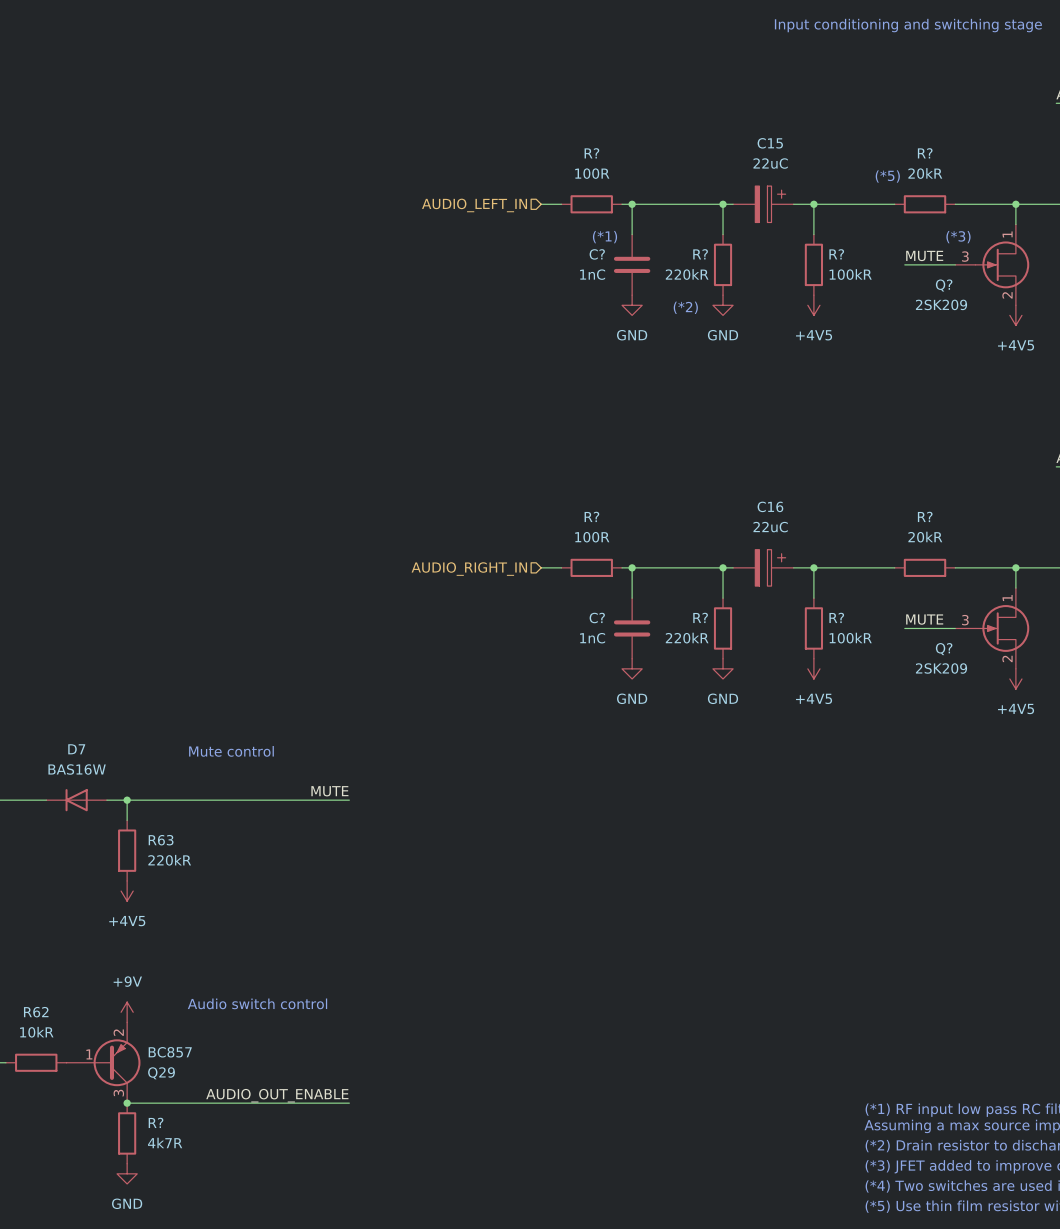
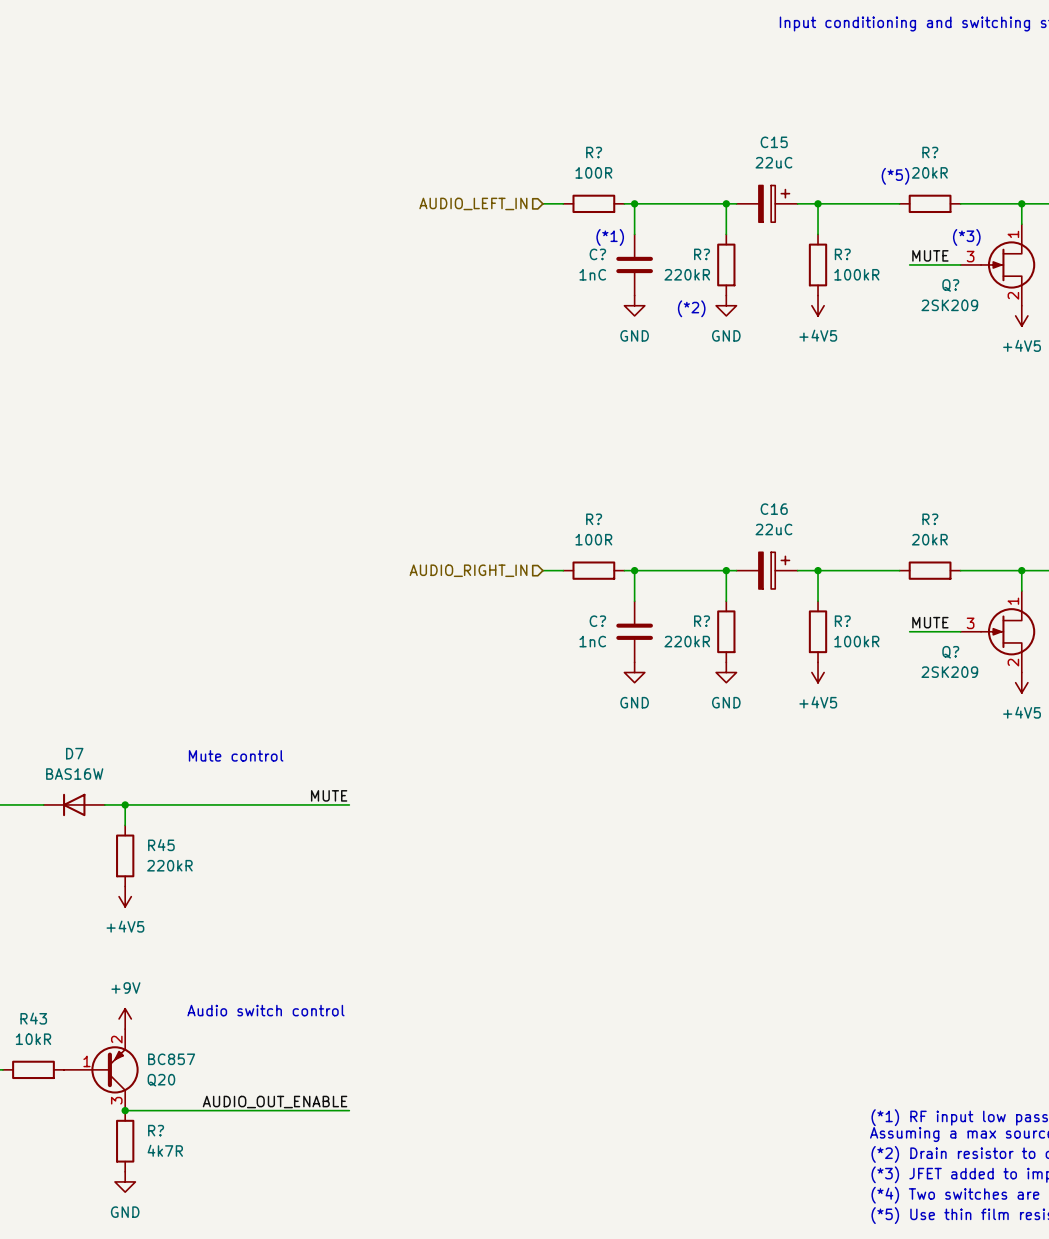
R63 name: R63 (161, 840) -> R45 (161, 845)
R62 name: R62 (36, 1012) -> R43 (33, 1018)
Q29 name: Q29 (161, 1073) -> Q20 (161, 1080)

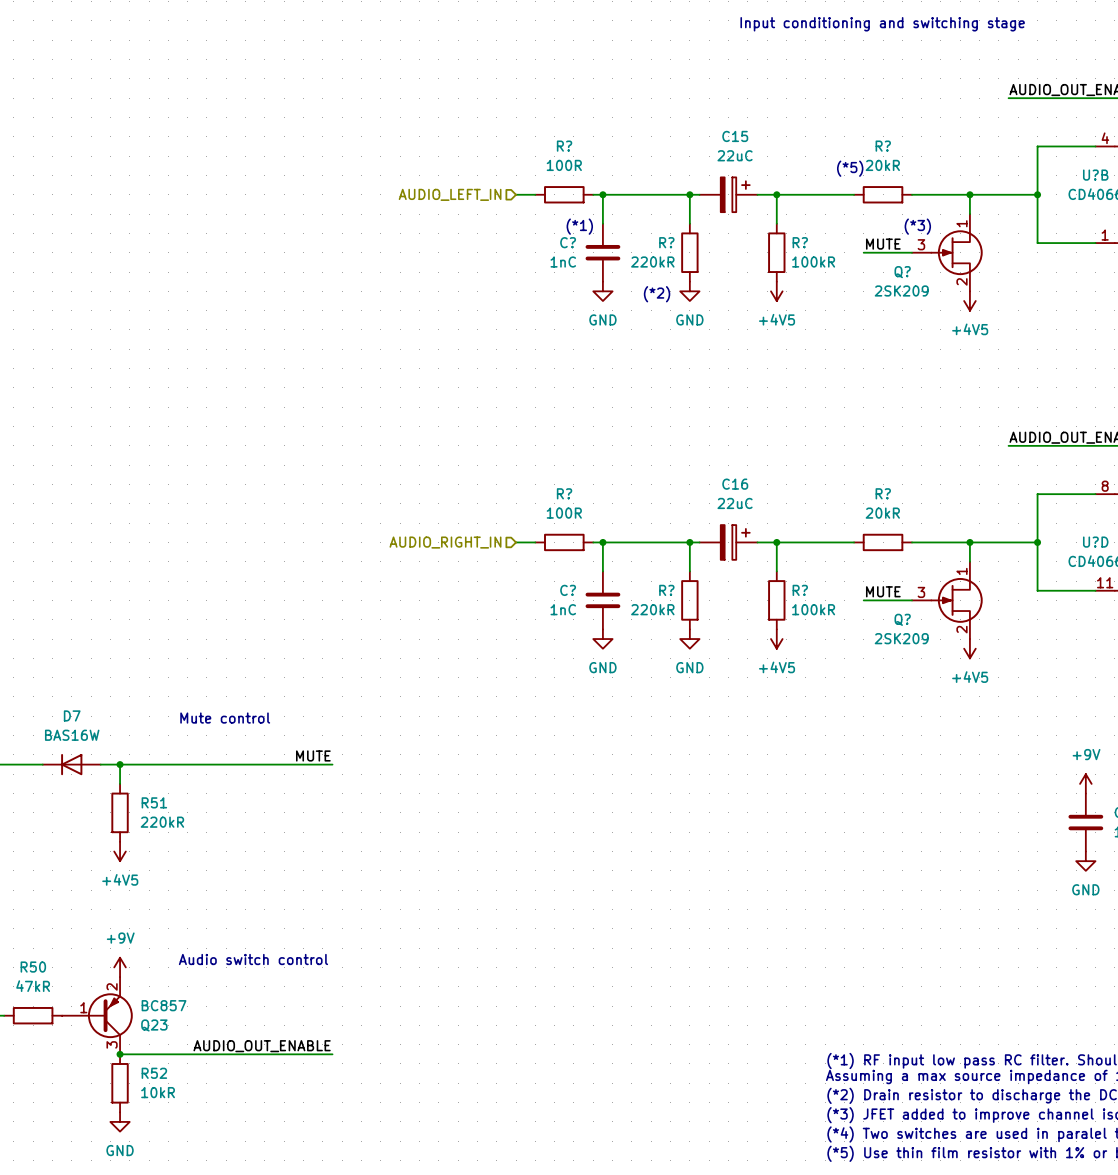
R45 name: R45 (161, 845) -> R51 (154, 802)
R43 name: R43 (33, 1018) -> R50 (33, 967)
R43 value: 10kR (33, 1039) -> 47kR (33, 986)
Q20 name: Q20 (161, 1080) -> Q23 (154, 1025)
R? name: R? (156, 1130) -> R52 (154, 1073)
R? value: 4k7R (165, 1150) -> 10kR (158, 1092)

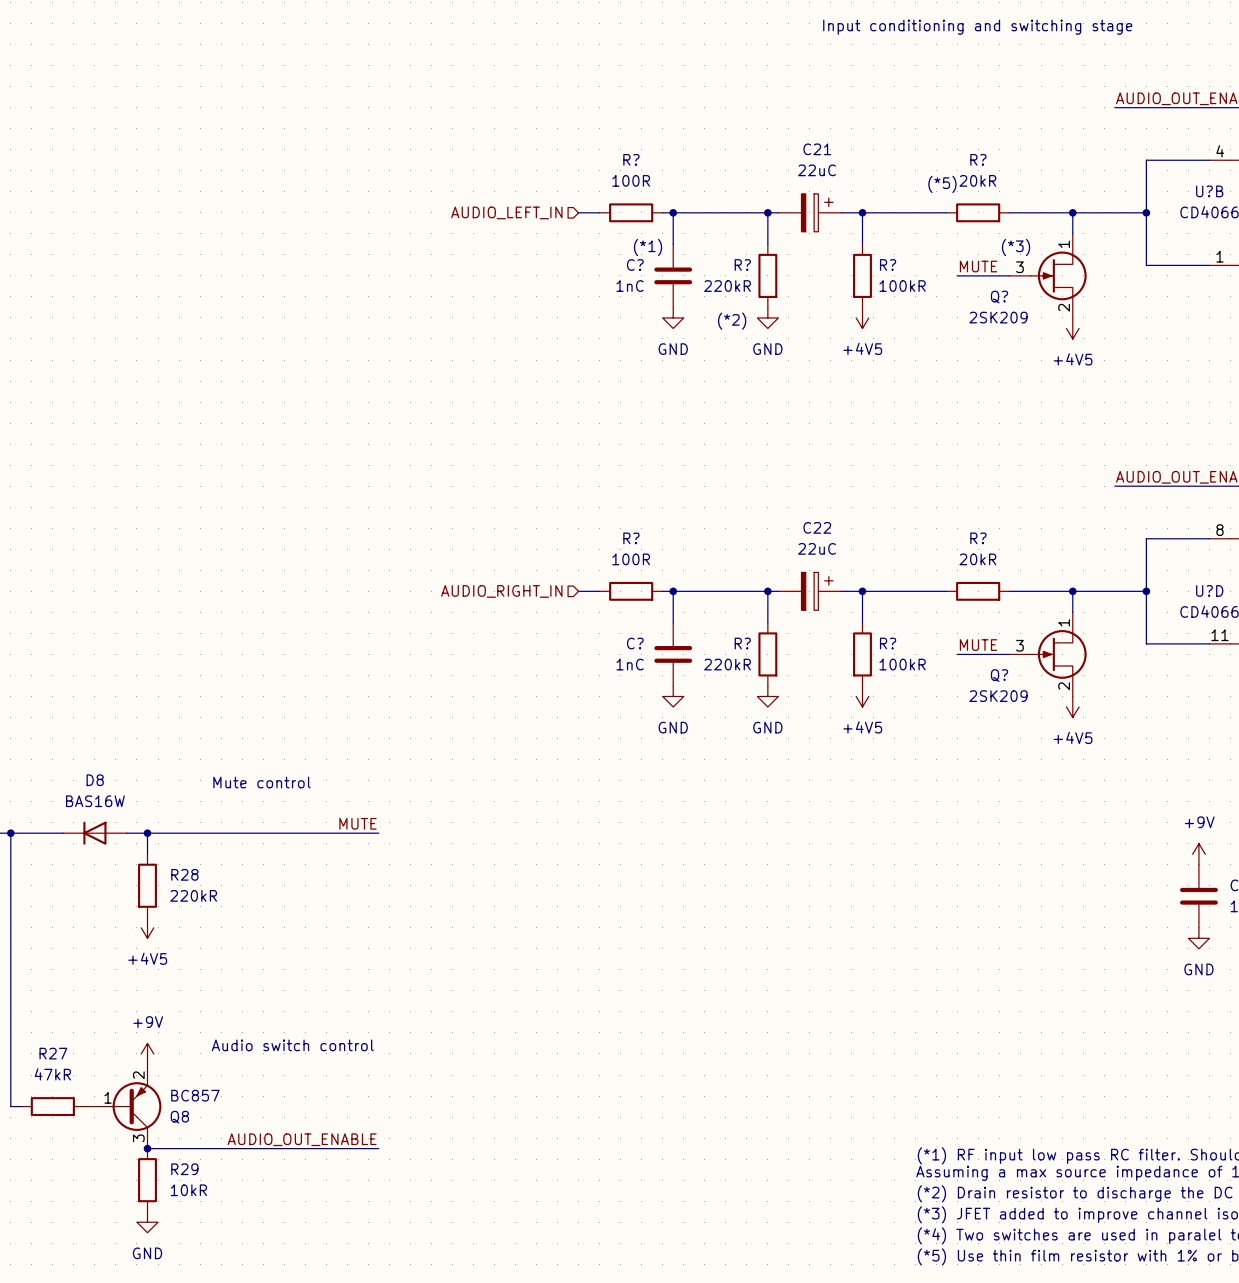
C15 name: C15 (735, 136) -> C21 (817, 149)
C16 name: C16 (735, 484) -> C22 (817, 527)
D7 name: D7 (72, 715) -> D8 (95, 780)
R51 name: R51 (154, 802) -> R28 (184, 874)
R50 name: R50 (33, 967) -> R27 (53, 1053)
Q23 name: Q23 (154, 1025) -> Q8 (179, 1117)
R52 name: R52 (154, 1073) -> R29 (184, 1169)

